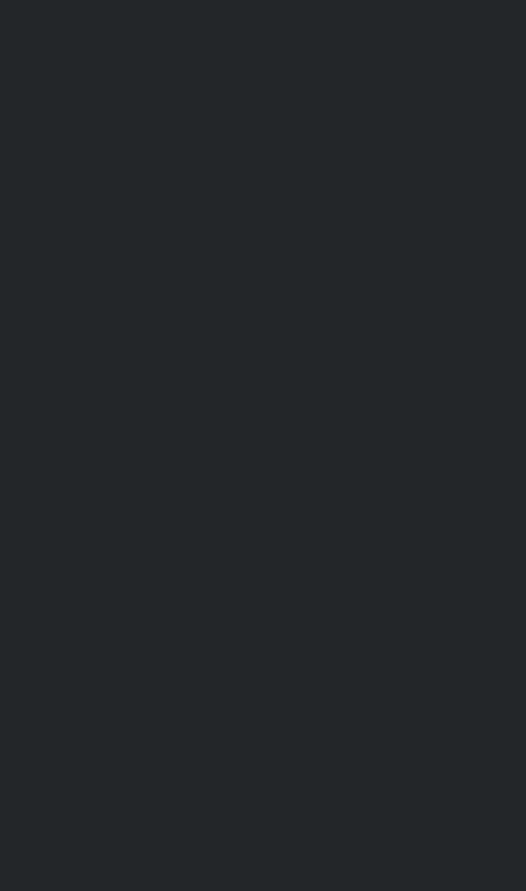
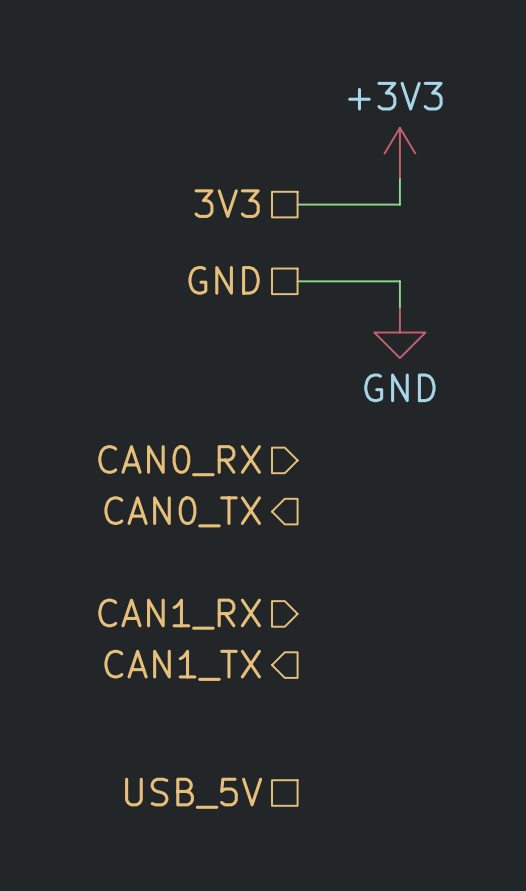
power symbol: none -> +3V3 (399, 153)
wire: none -> (399, 179) (399, 204) (297, 204)
hierarchical label: none -> 3V3 (227, 203)
hierarchical label: none -> GND (224, 280)
wire: none -> (297, 281) (399, 281) (399, 306)
power symbol: none -> GND (399, 332)
hierarchical label: none -> CAN0_RX (179, 460)
hierarchical label: none -> CAN0_TX (182, 511)
hierarchical label: none -> CAN1_RX (179, 614)
hierarchical label: none -> CAN1_TX (182, 665)
hierarchical label: none -> USB_5V (193, 793)

